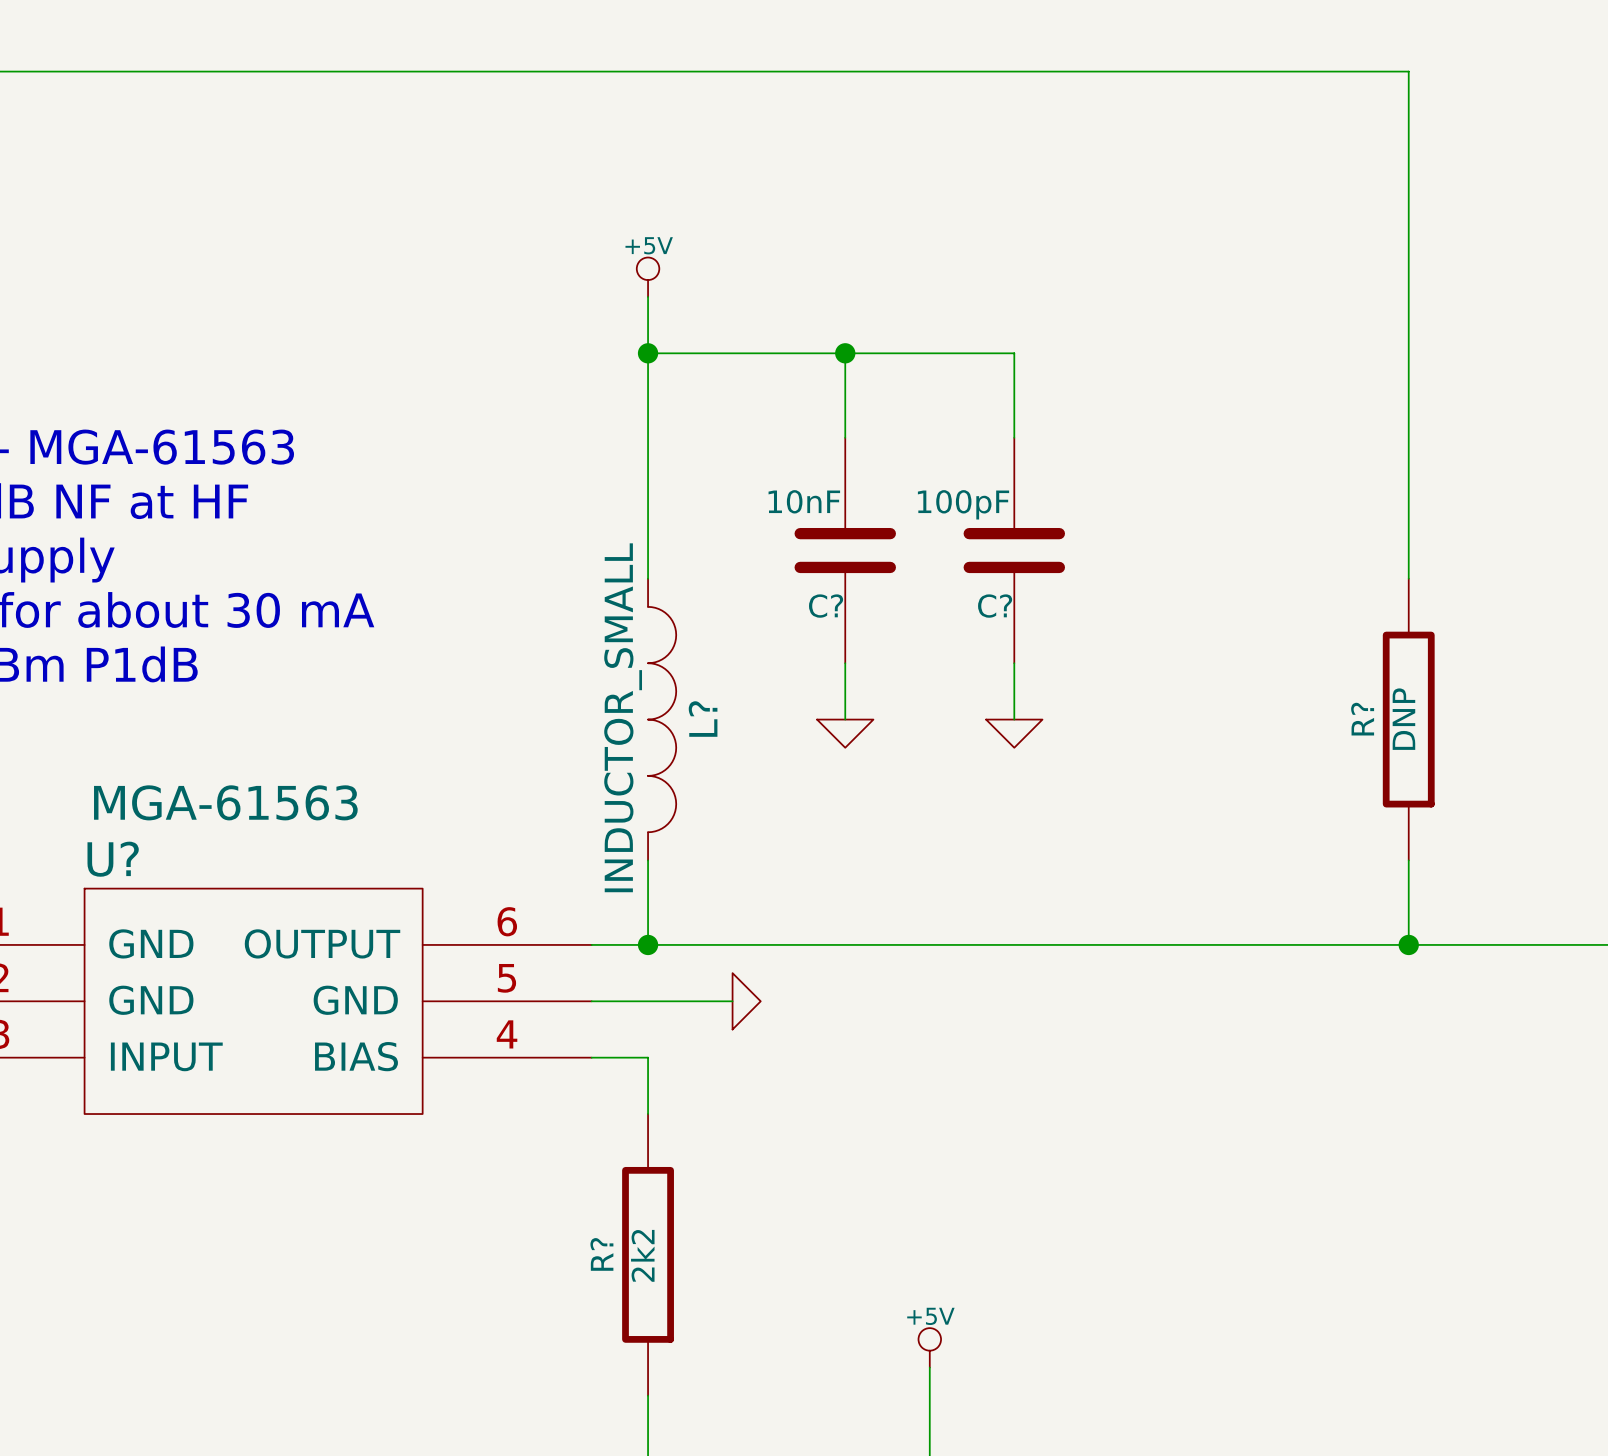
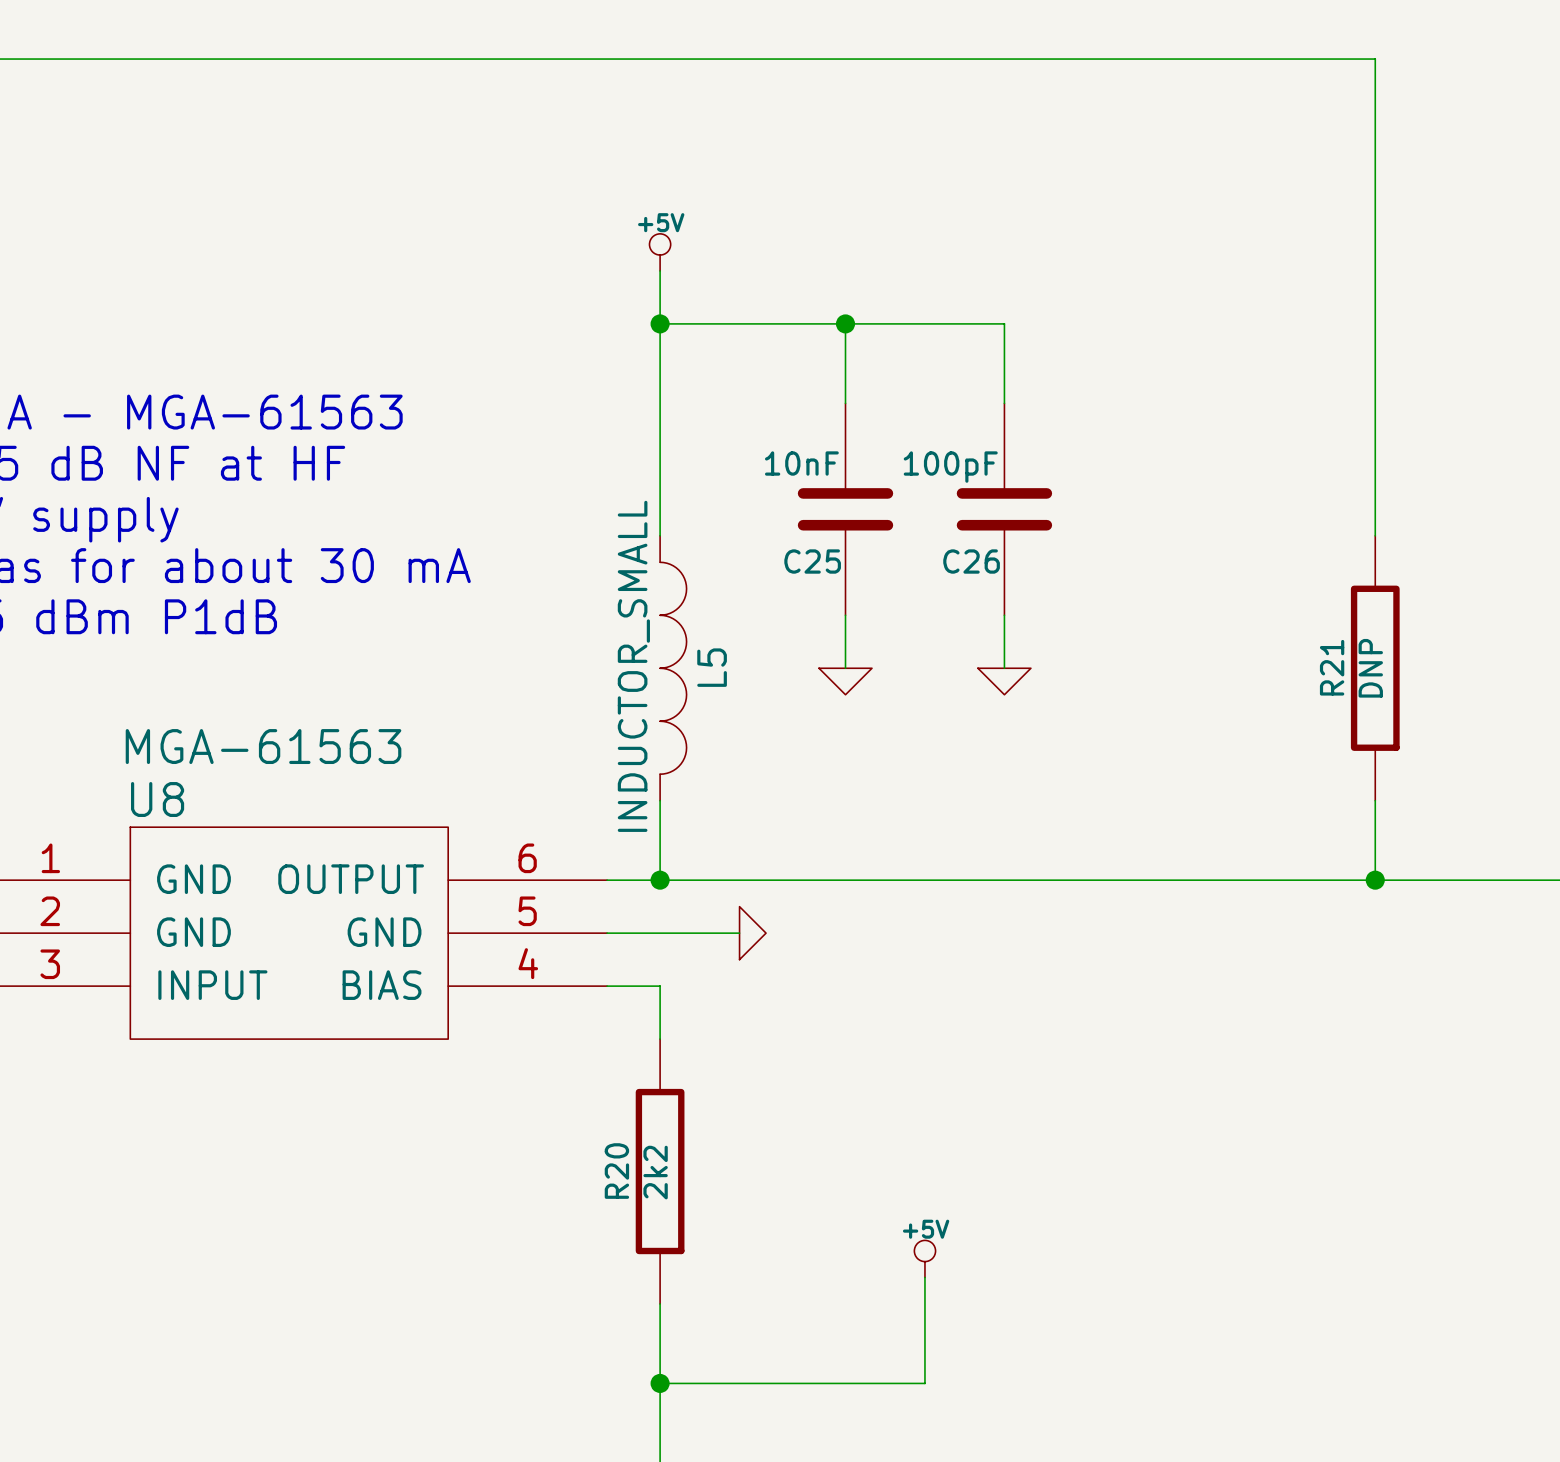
C? name: C? (826, 606) -> C25 (812, 561)
C? name: C? (995, 606) -> C26 (971, 561)
L? name: L? (703, 719) -> L5 (712, 667)
R? name: R? (1362, 719) -> R21 (1332, 667)
U? name: U? (113, 859) -> U8 (157, 799)
R? name: R? (601, 1254) -> R20 (616, 1171)

